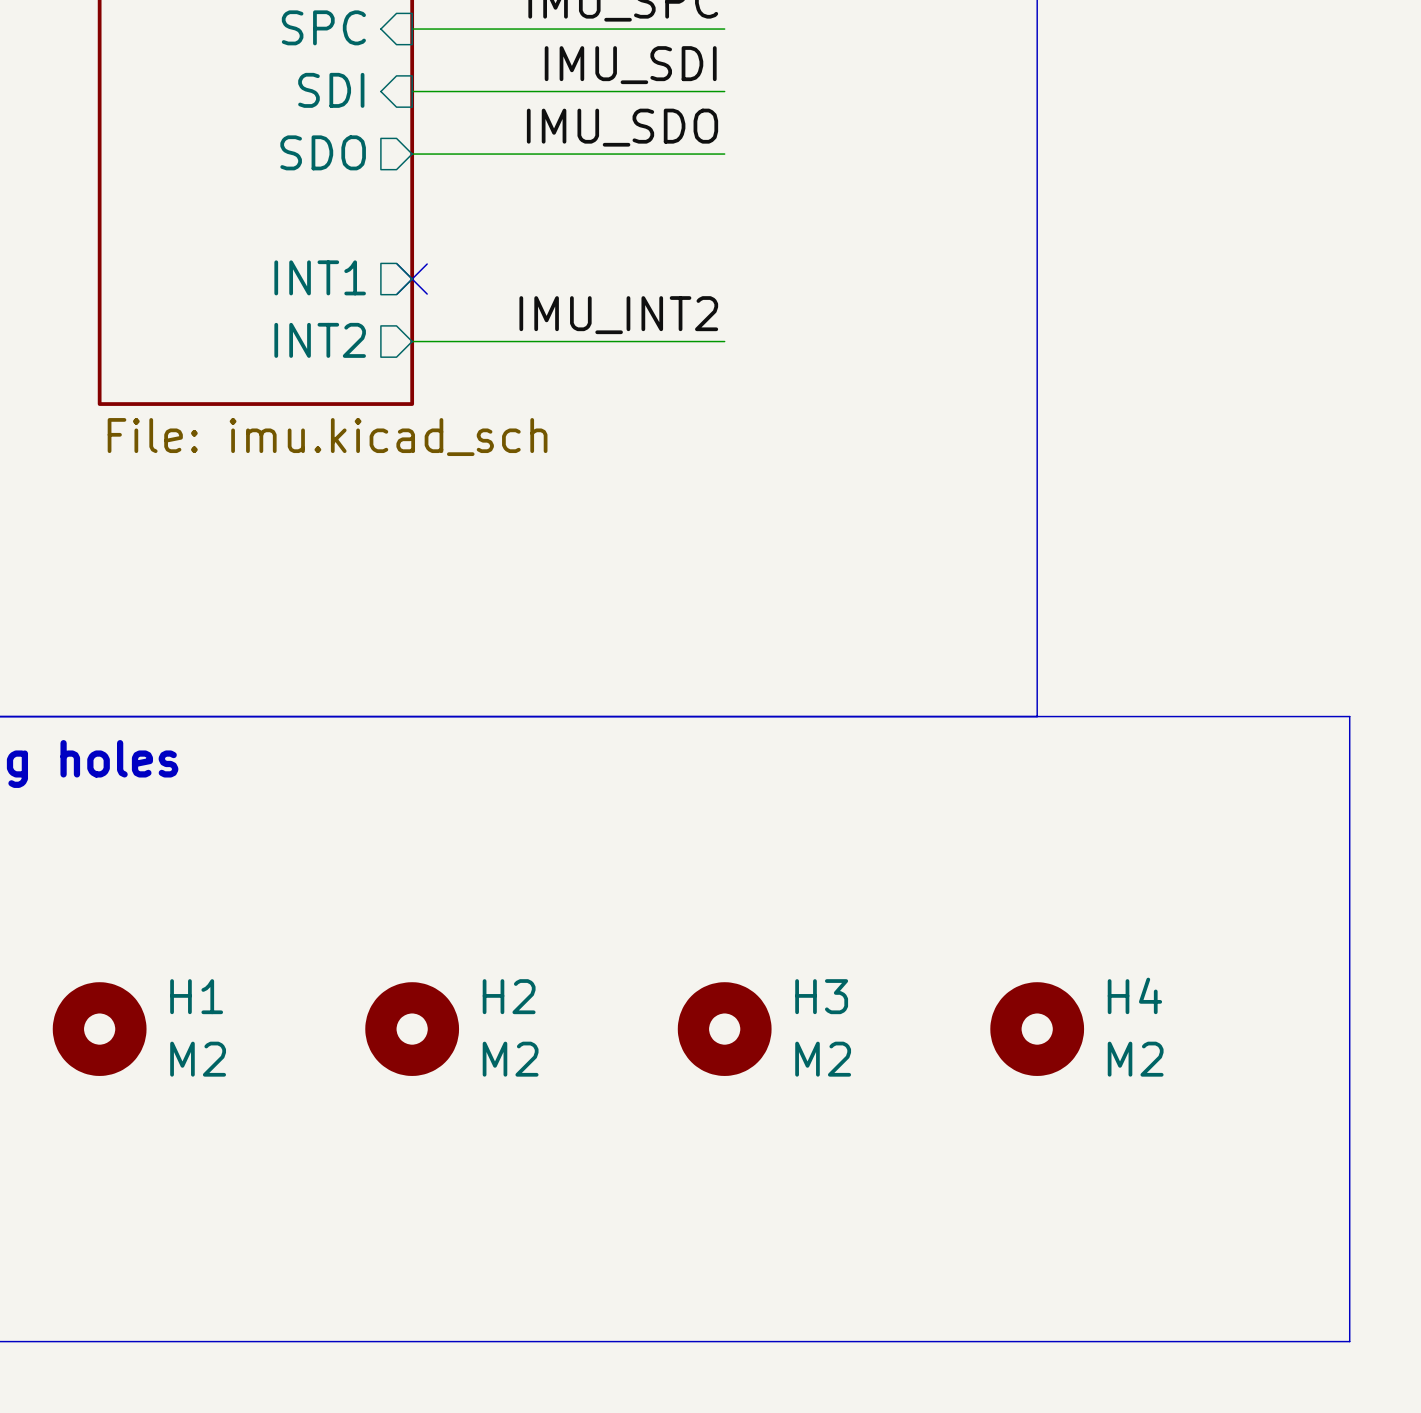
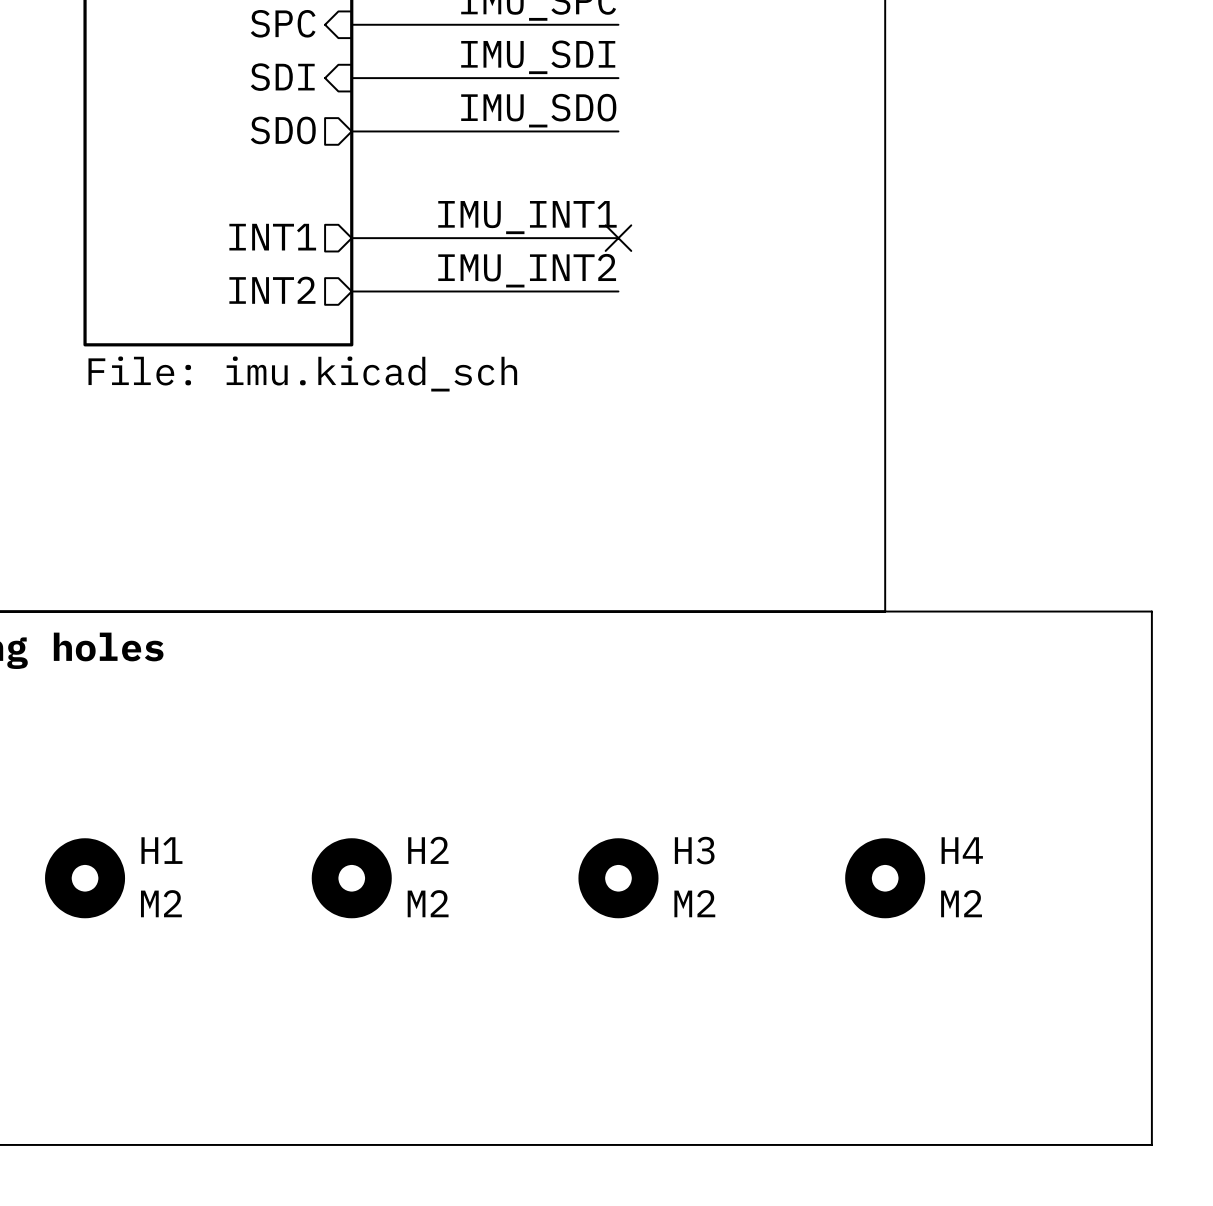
label: none -> IMU_INT1 (527, 217)
wire: none -> (351, 238) (618, 238)
no-connect mark: (412, 279) -> none
no-connect mark: none -> (618, 238)

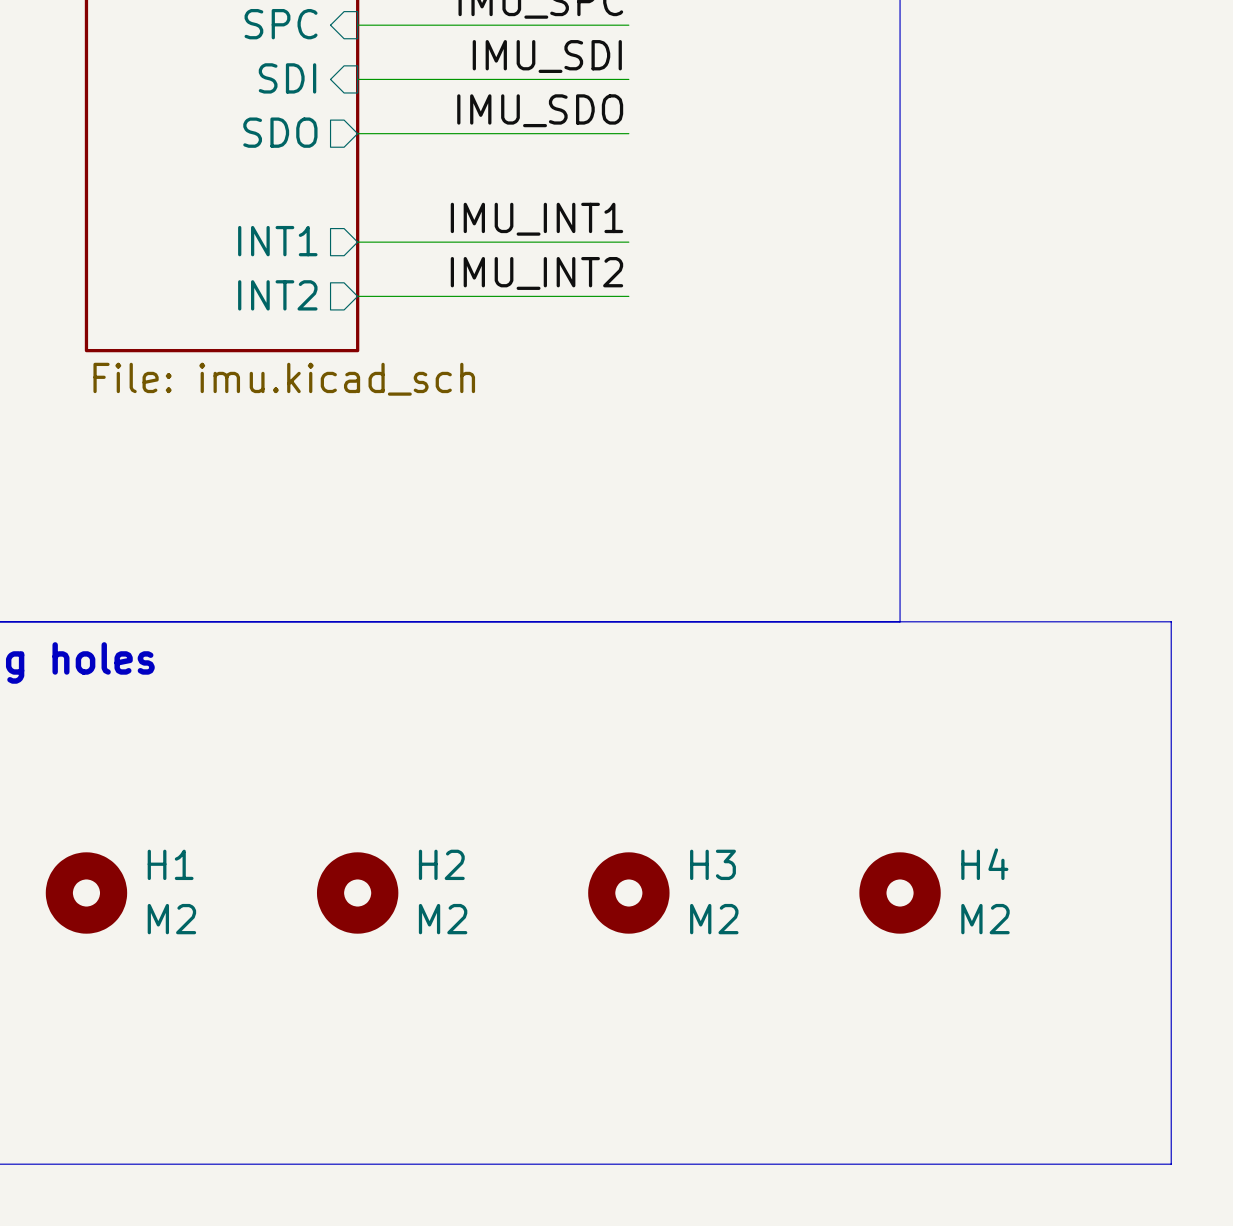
no-connect mark: (618, 238) -> none

